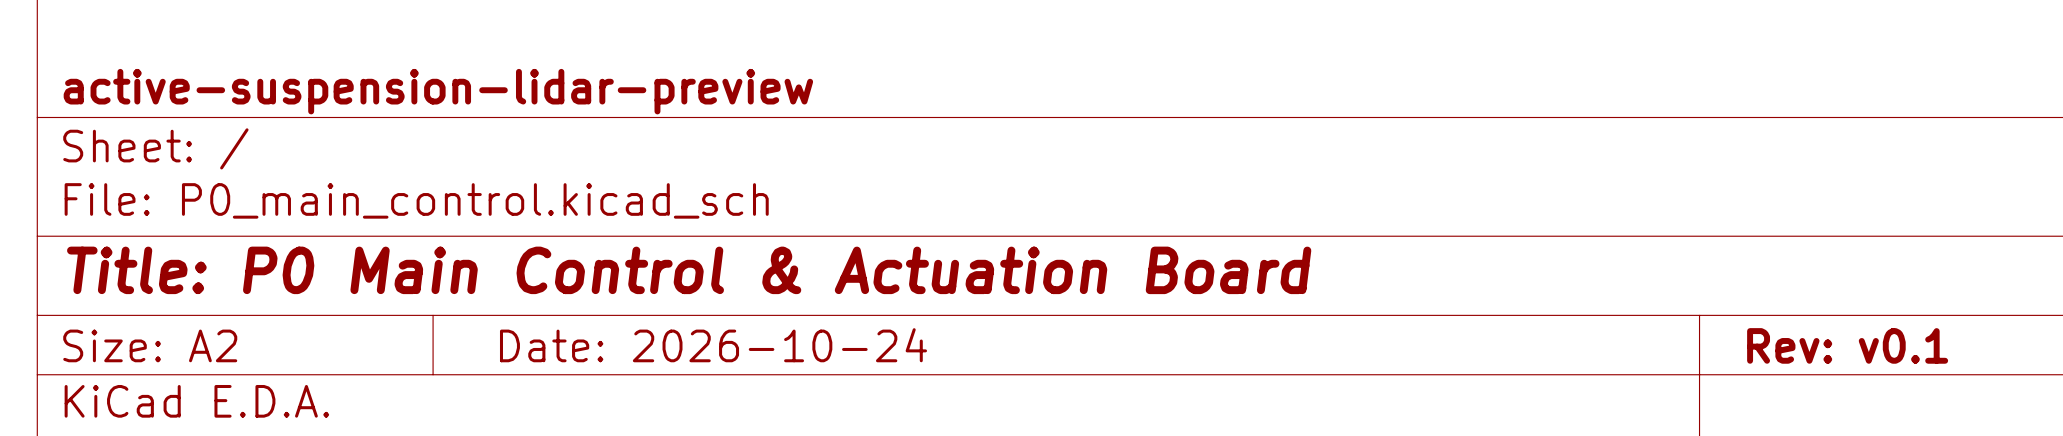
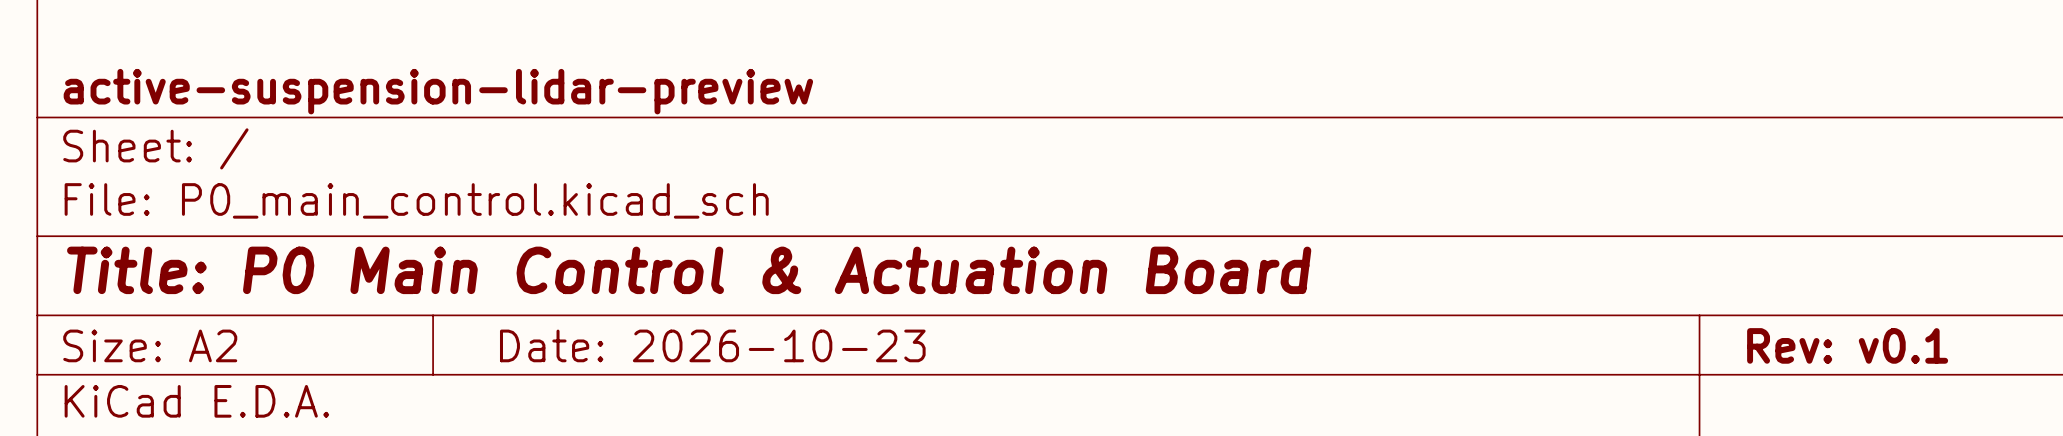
title block: Date: 2026-10-24 (713, 345) -> Date: 2026-10-23 (712, 345)

